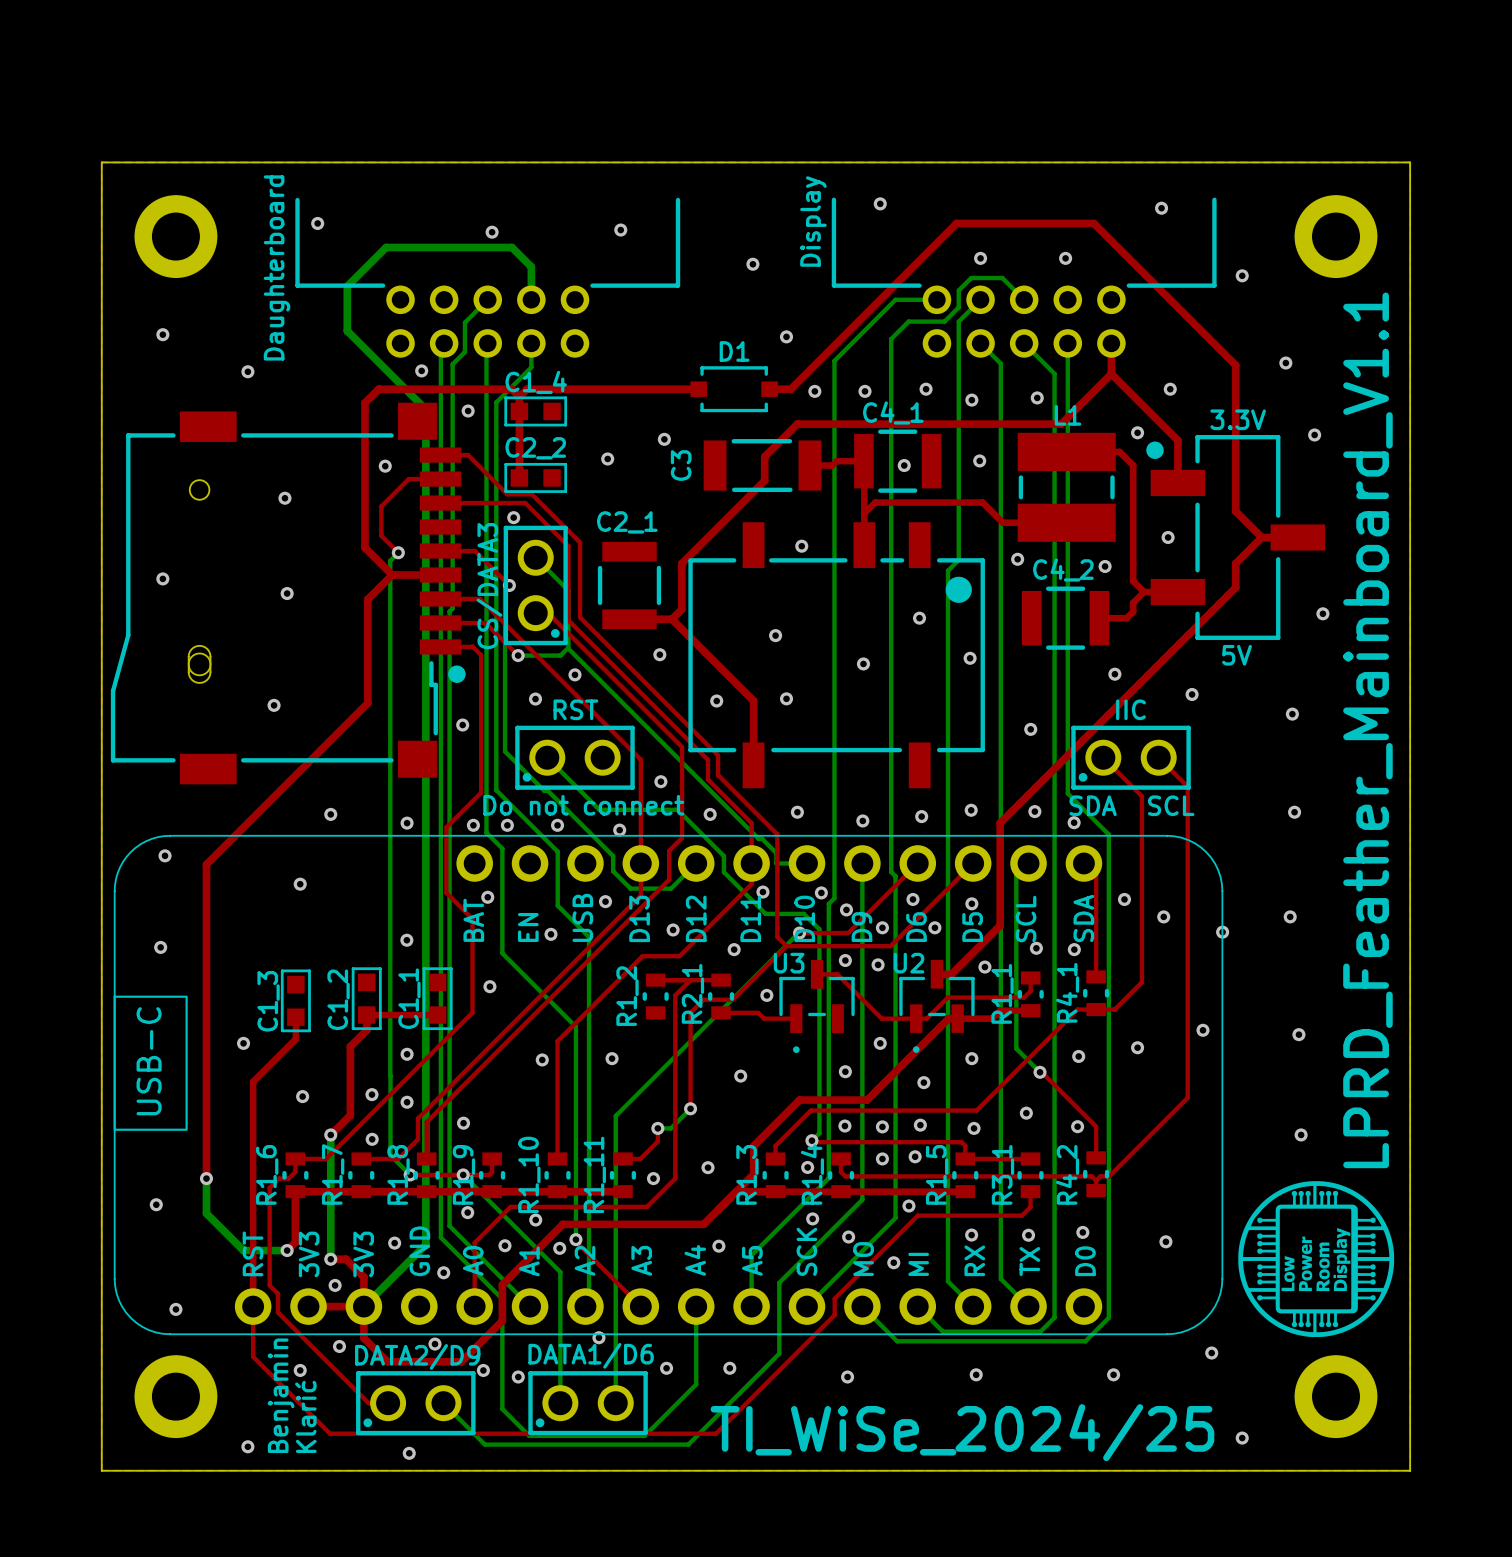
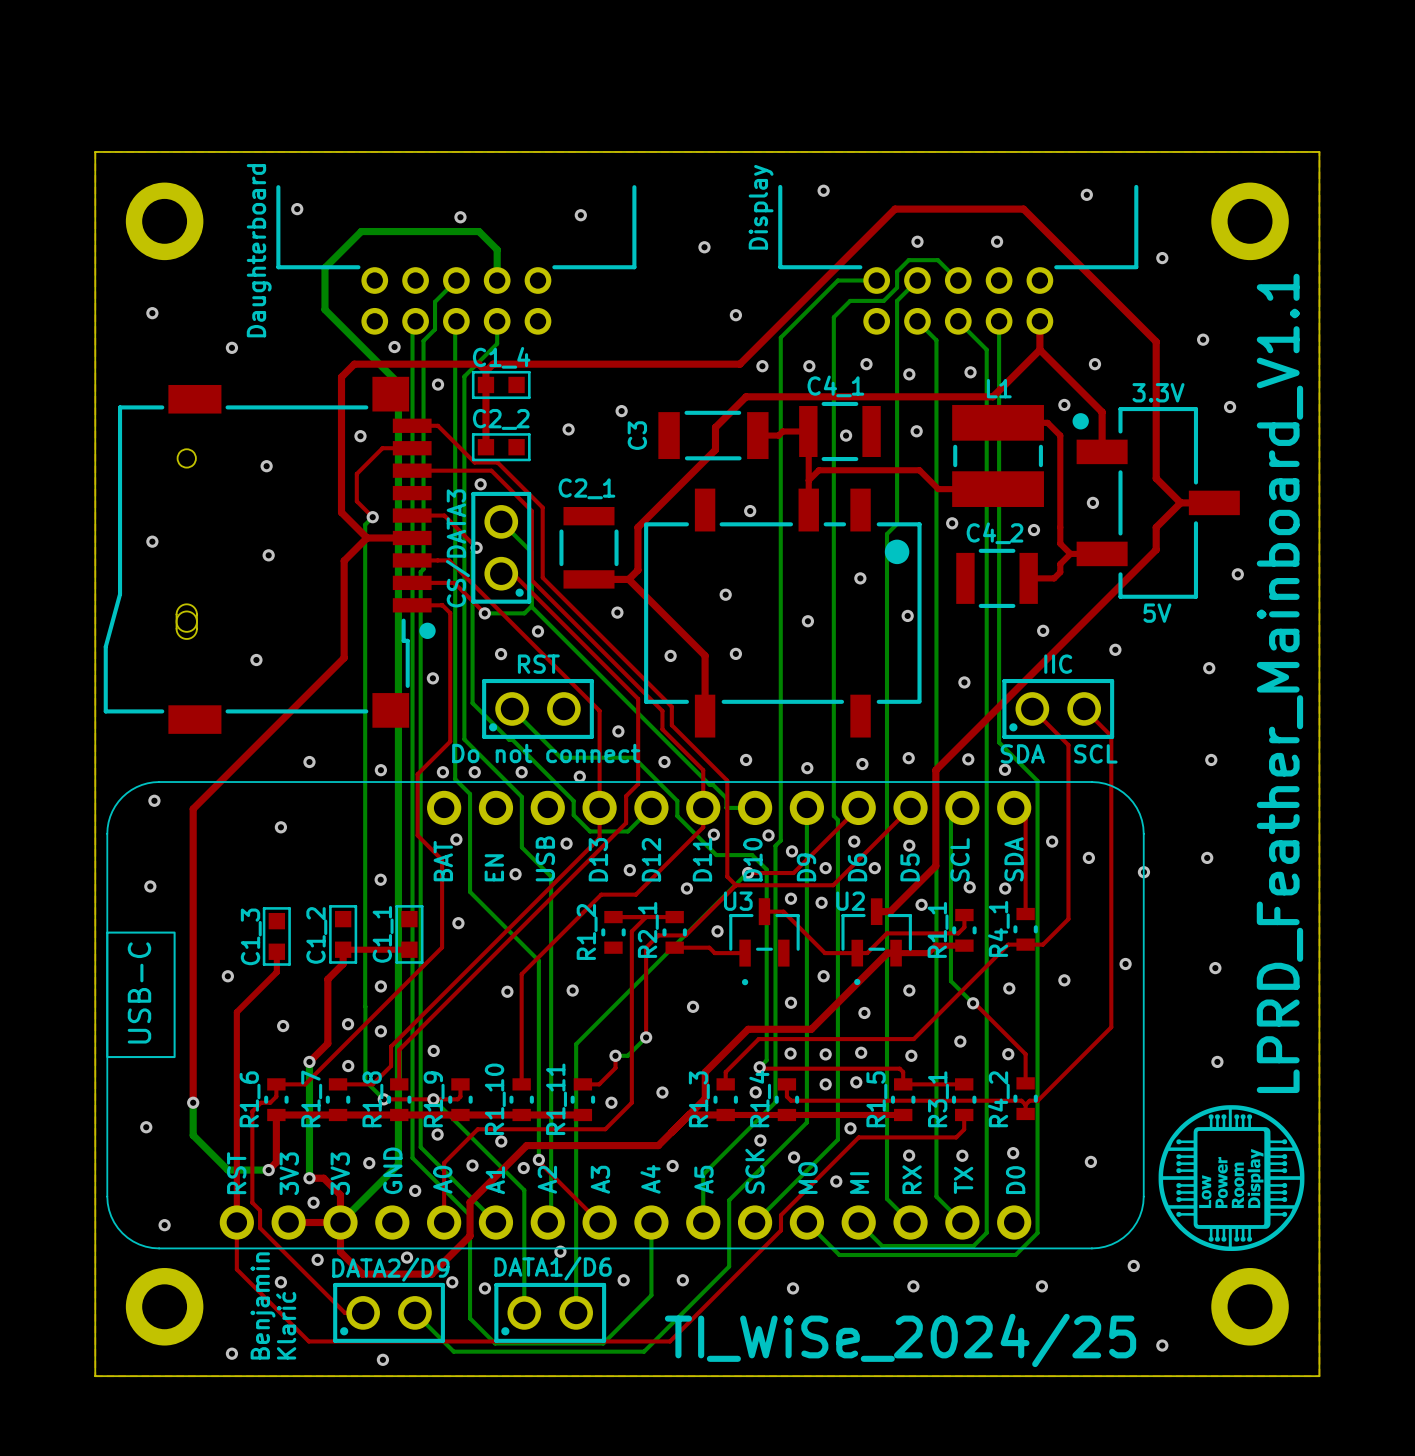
top track: none -> (653, 364) (720, 364)
D1: (734, 389) -> none

